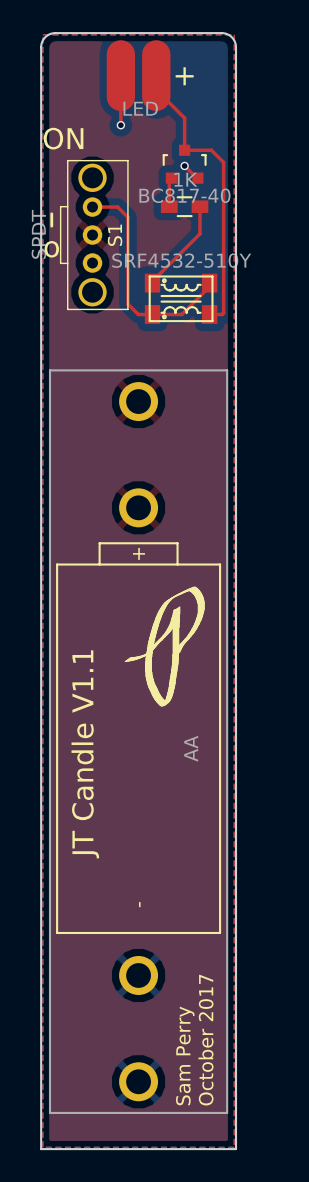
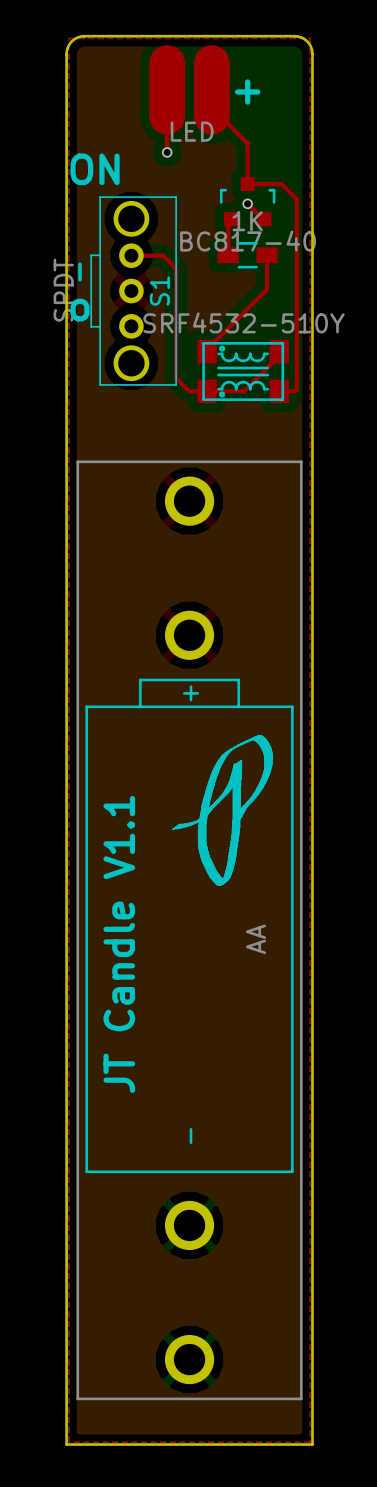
text: October 2017 (205, 1040) -> none
text: Sam Perry (185, 1055) -> none

